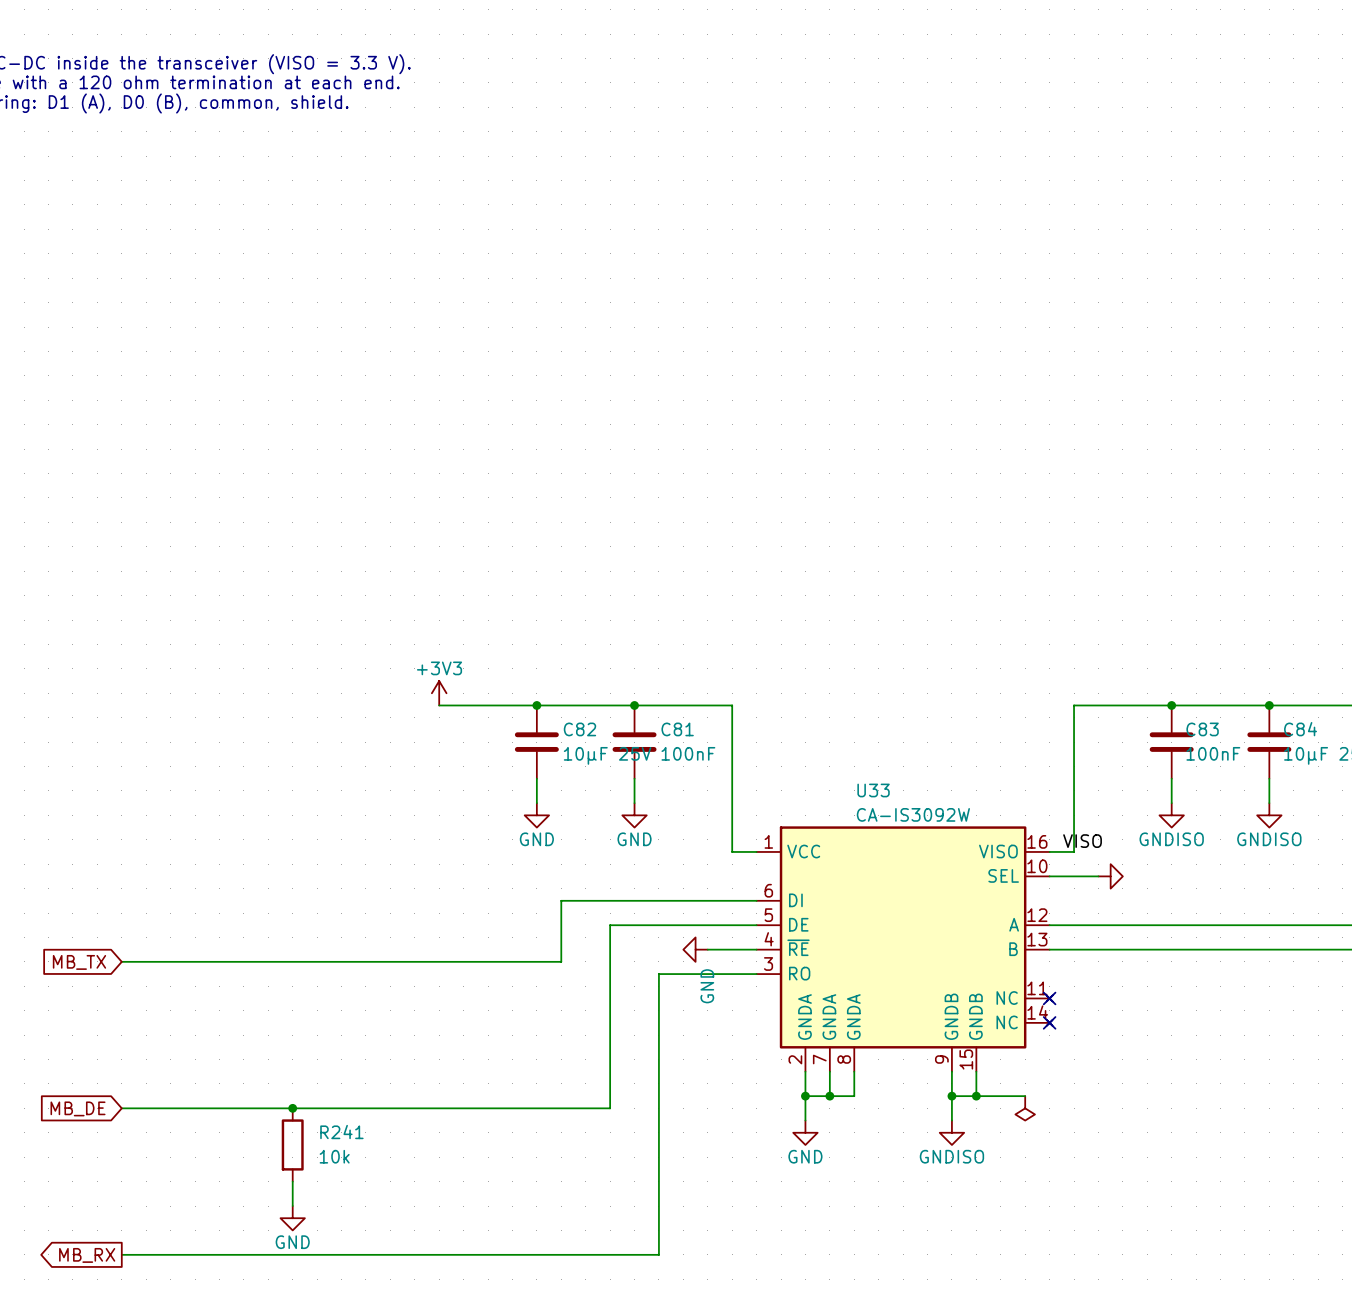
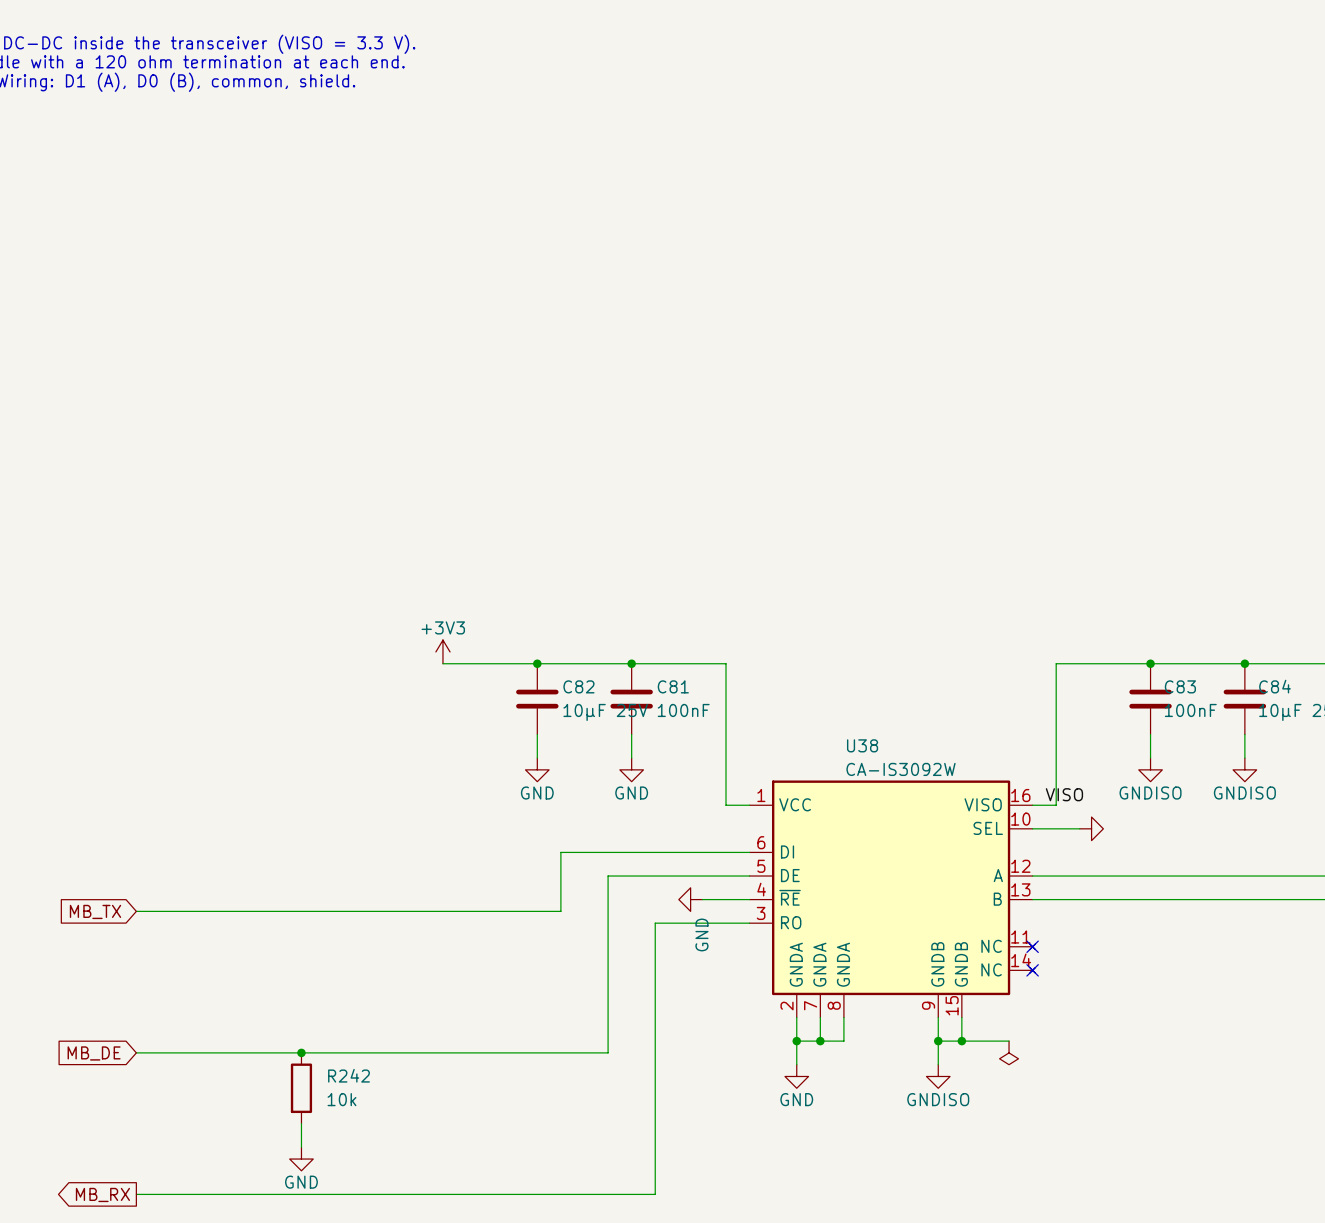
U33 name: U33 (873, 790) -> U38 (862, 745)
R241 name: R241 (341, 1132) -> R242 (349, 1075)

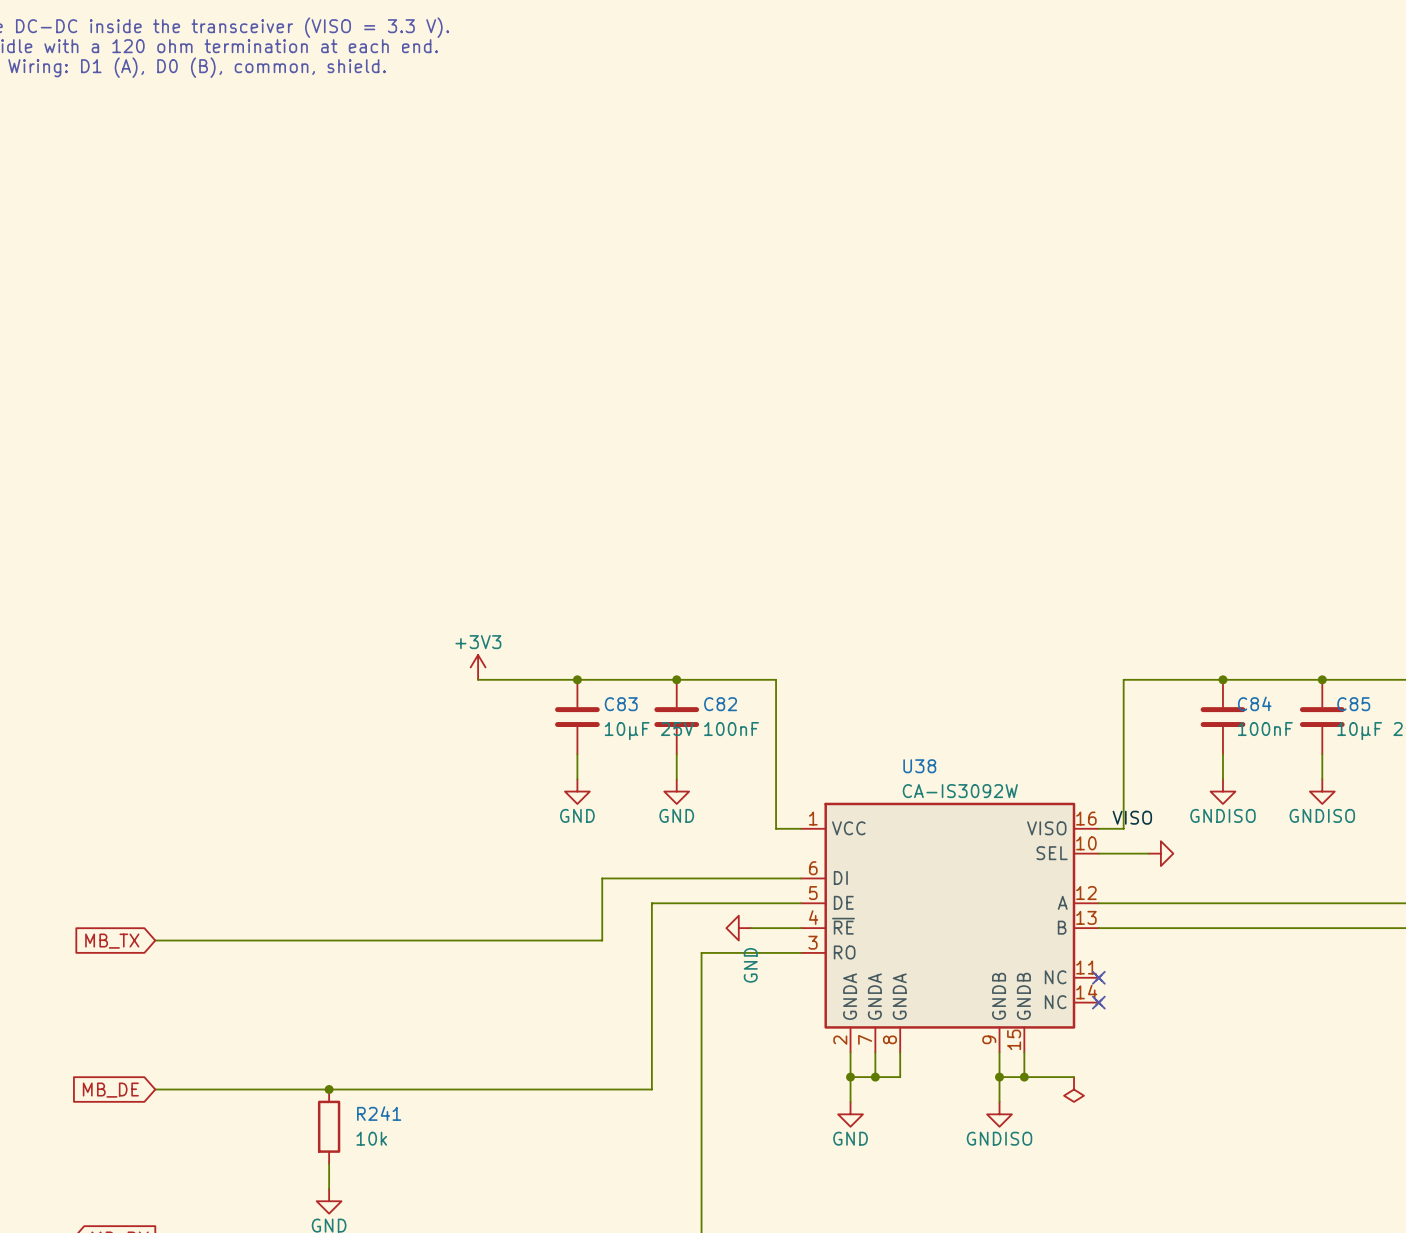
C82 name: C82 (578, 686) -> C83 (621, 704)
C81 name: C81 (673, 686) -> C82 (720, 704)
C83 name: C83 (1180, 686) -> C84 (1254, 703)
C84 name: C84 (1275, 686) -> C85 (1353, 704)
R242 name: R242 (349, 1075) -> R241 (379, 1113)

